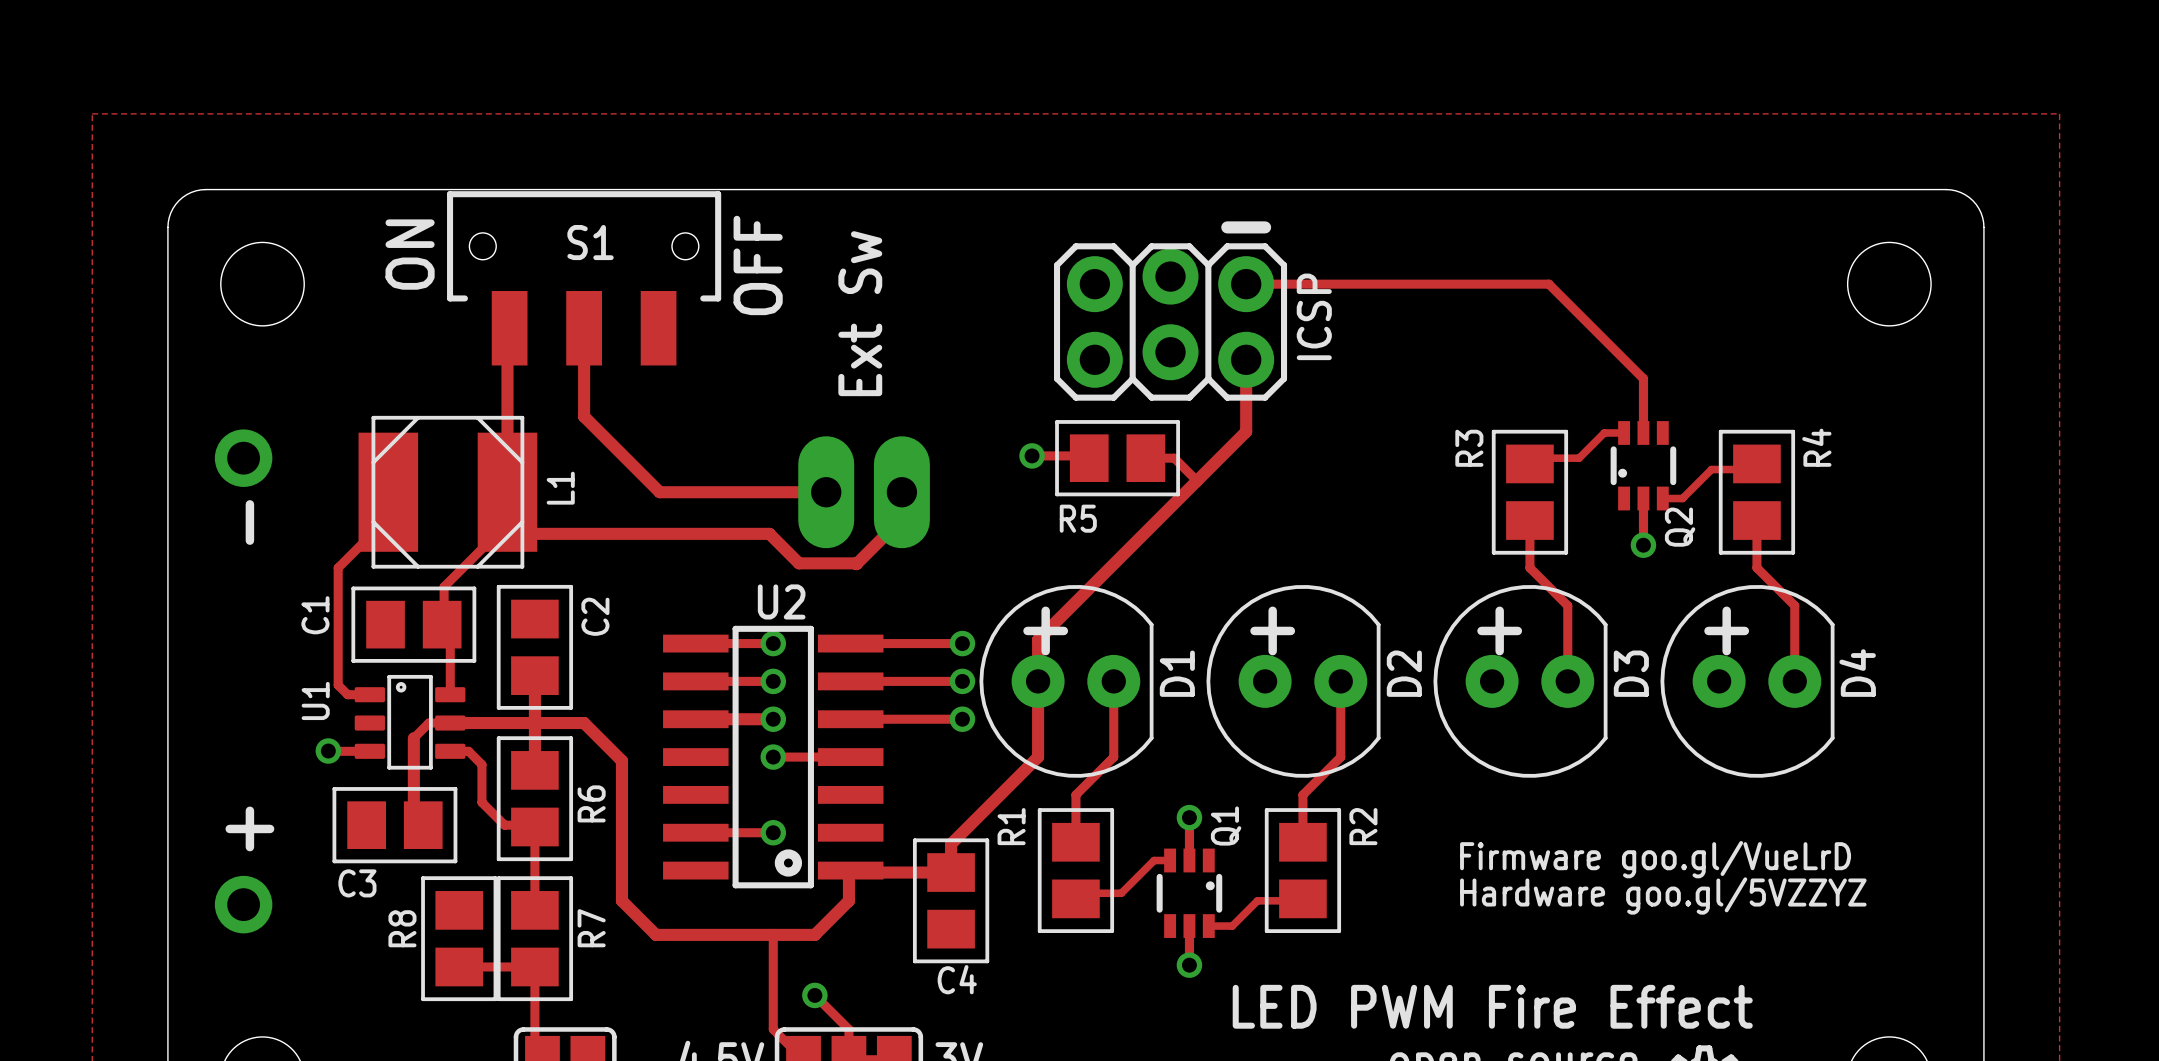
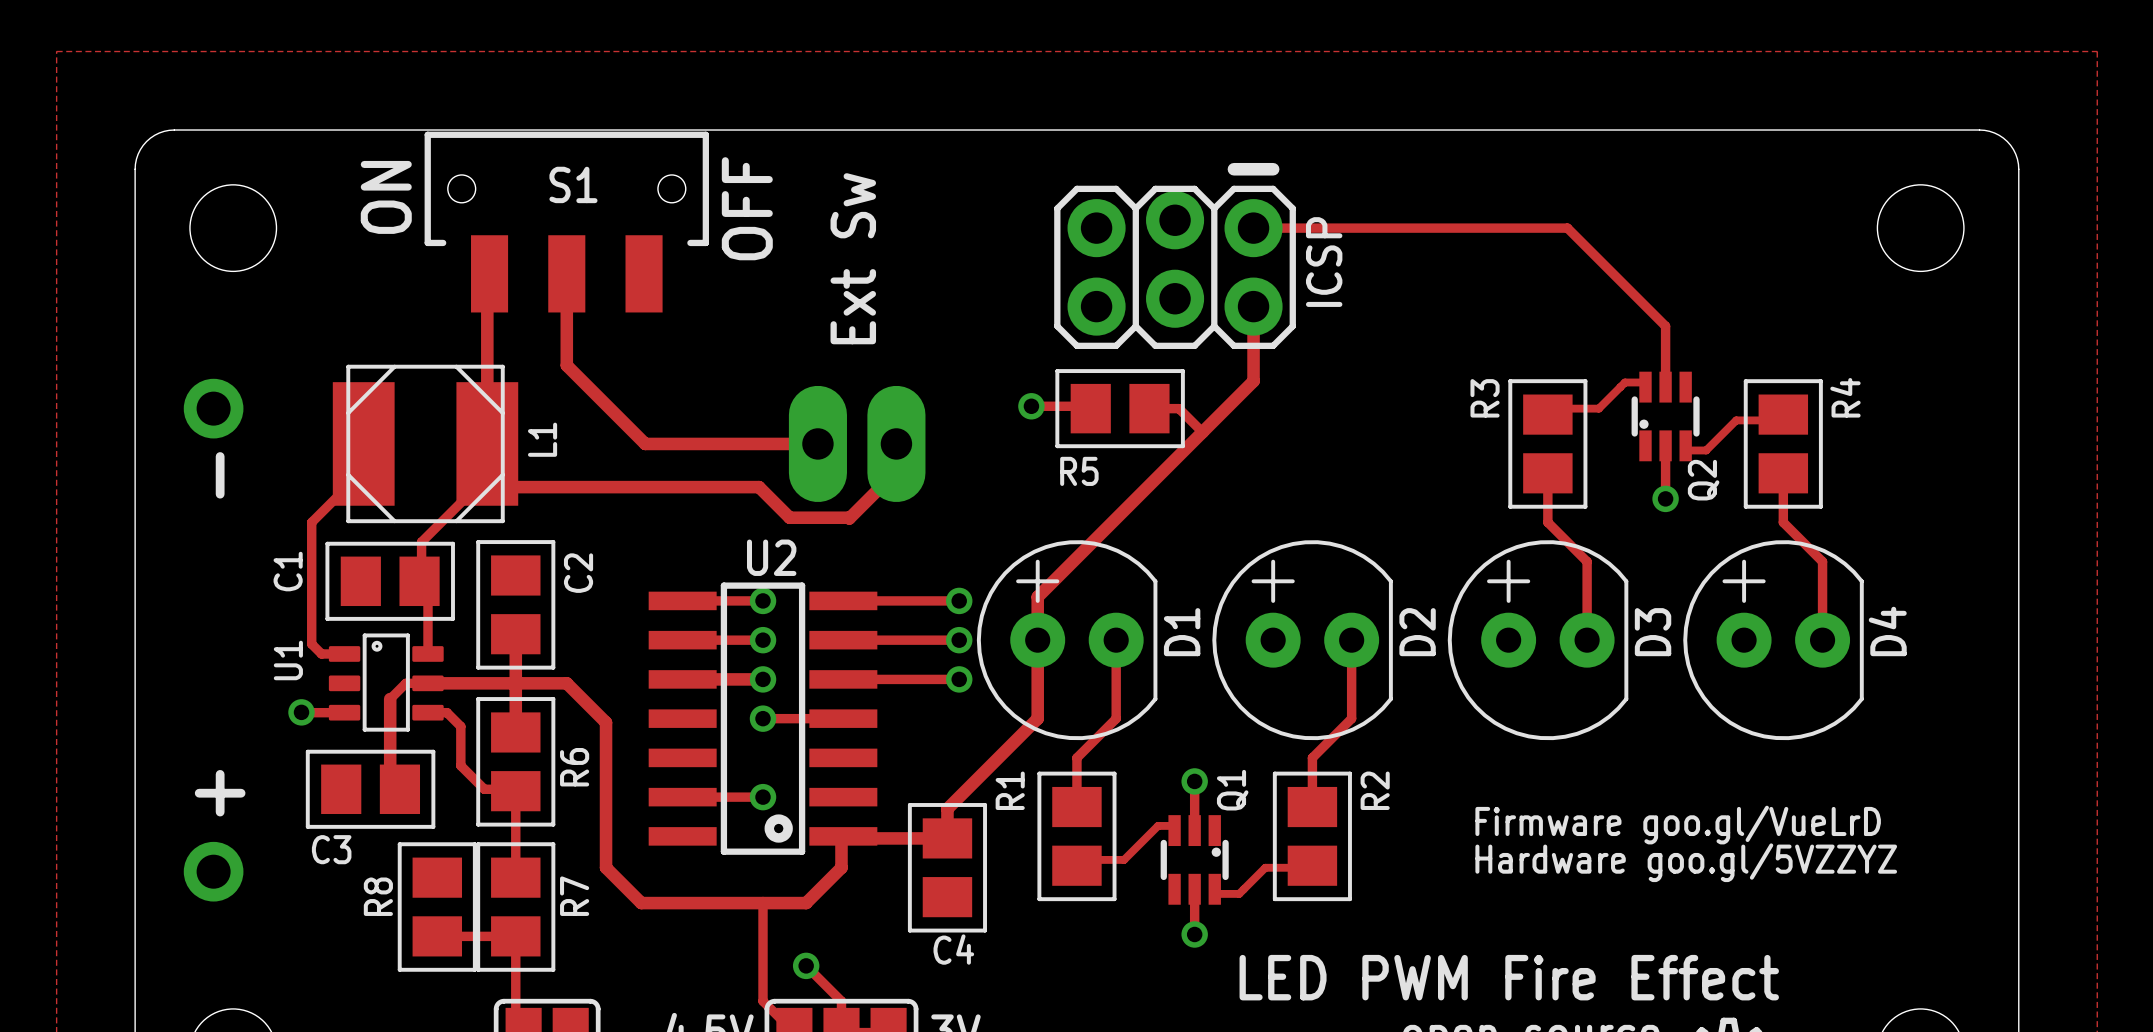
Q2 footprint: [1610, 421, 1677, 511] -> [1631, 371, 1700, 462]
D1 footprint: [979, 585, 1154, 778] -> [976, 540, 1158, 741]
D2 footprint: [1206, 585, 1381, 778] -> [1212, 540, 1393, 741]
D3 footprint: [1433, 585, 1608, 778] -> [1447, 540, 1629, 741]
D4 footprint: [1660, 585, 1835, 778] -> [1683, 540, 1864, 741]
Q1 footprint: [1156, 848, 1223, 938] -> [1160, 815, 1229, 905]

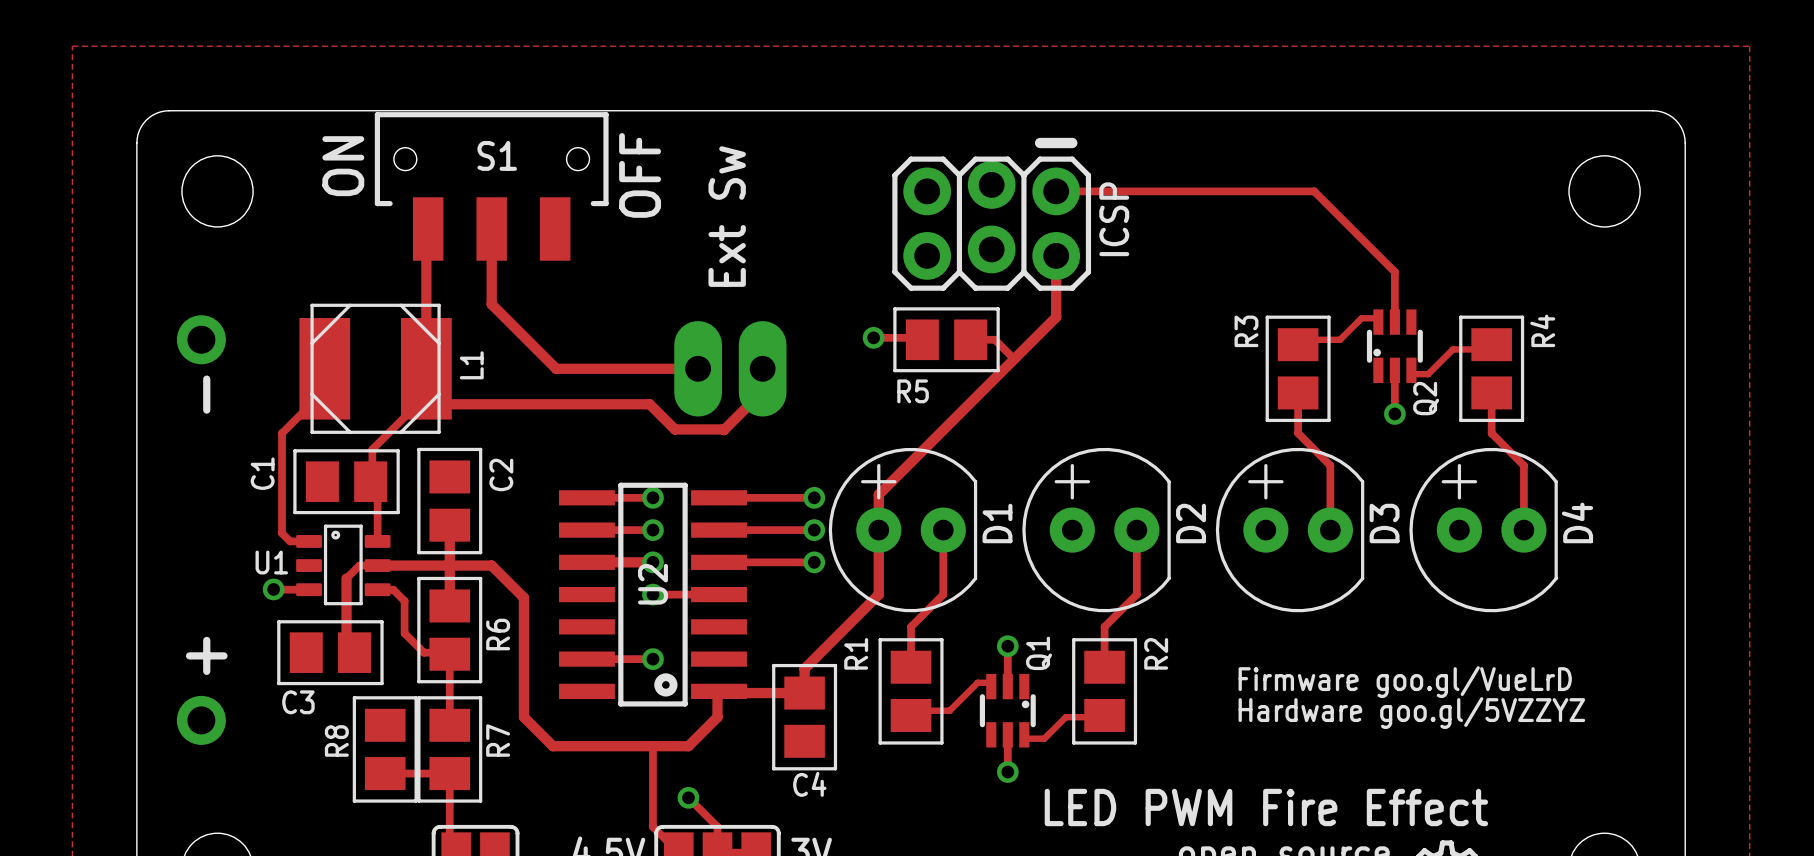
U2 name rotation: 0° (771, 557) -> 90° counterclockwise (652, 584)
U2 name position: U2 (771, 557) -> U2 (652, 584)
U1 name rotation: 0° (288, 660) -> 90° clockwise (271, 562)

